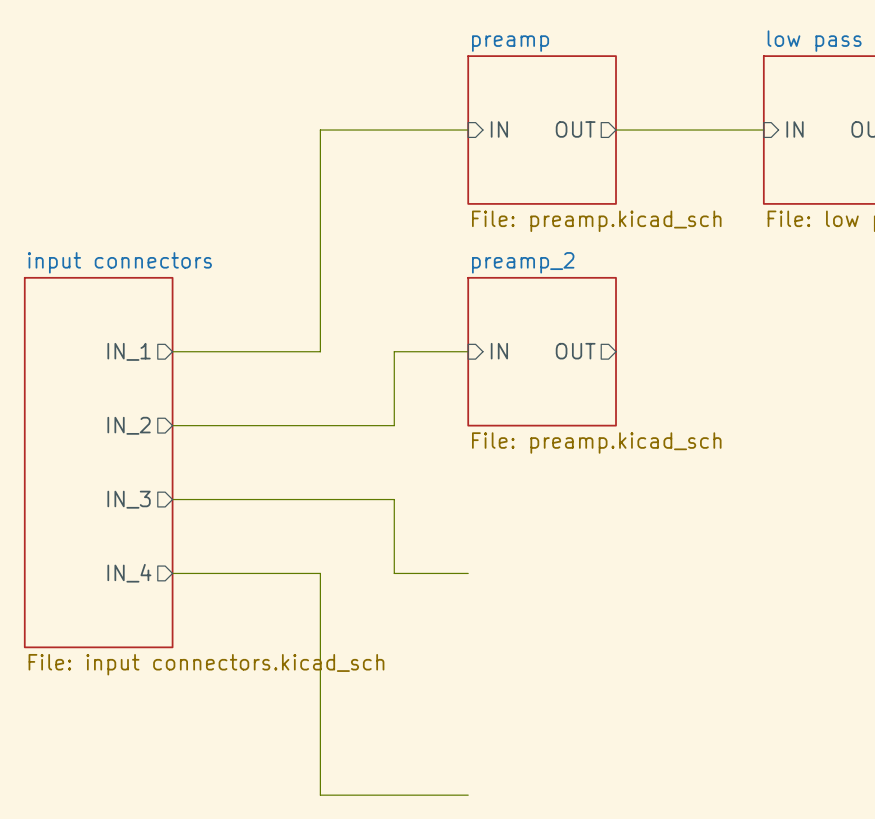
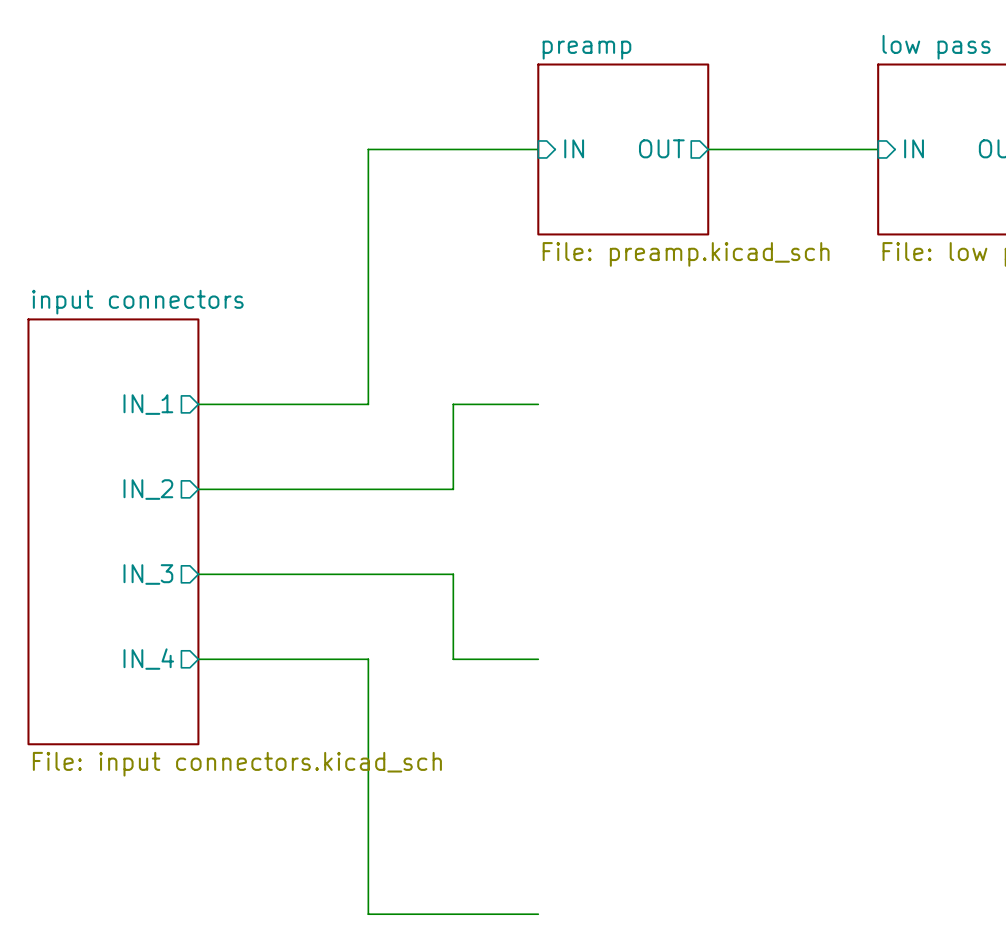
sheet pin: IN (499, 351) -> none
sheet preamp_2: File: preamp.kicad_sch (542, 351) -> none
sheet pin: OUT (575, 351) -> none

